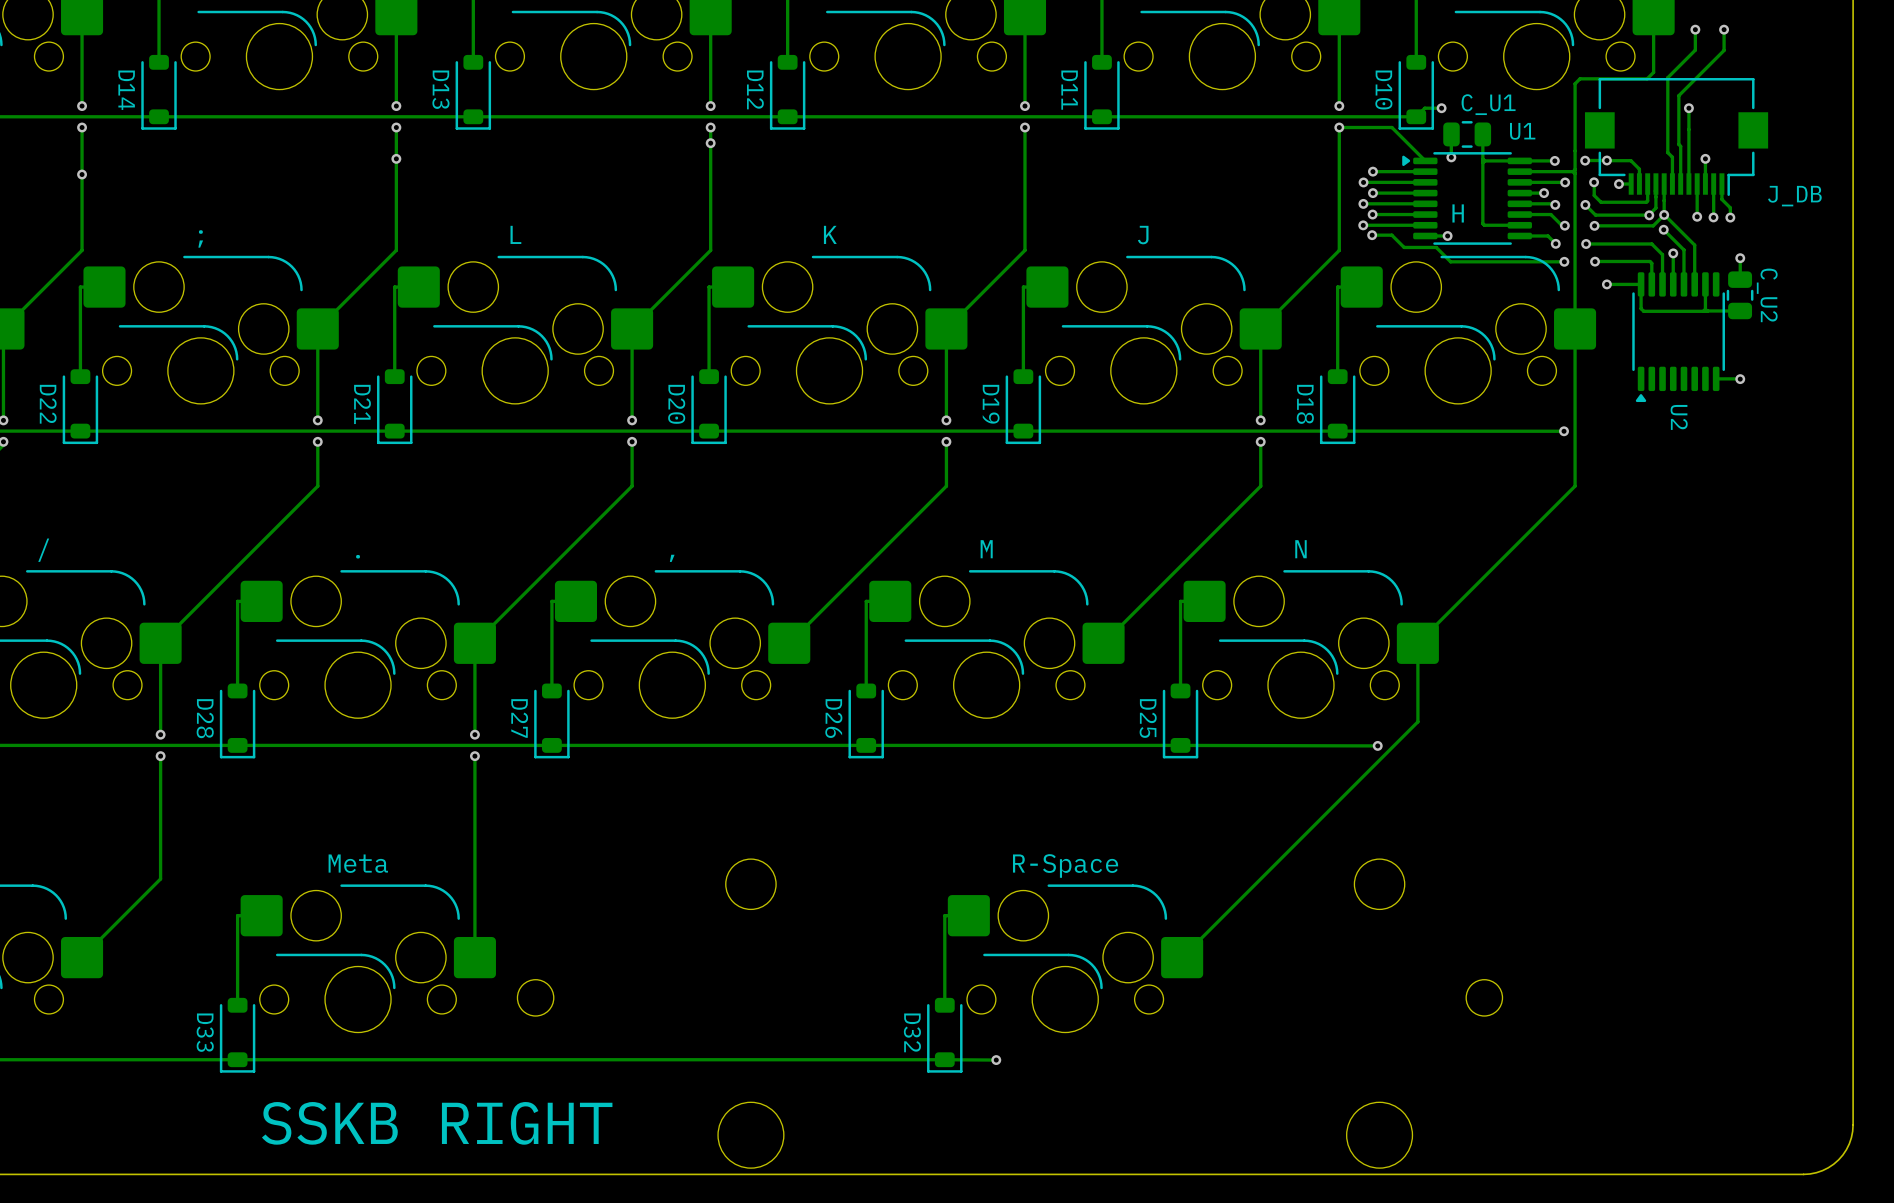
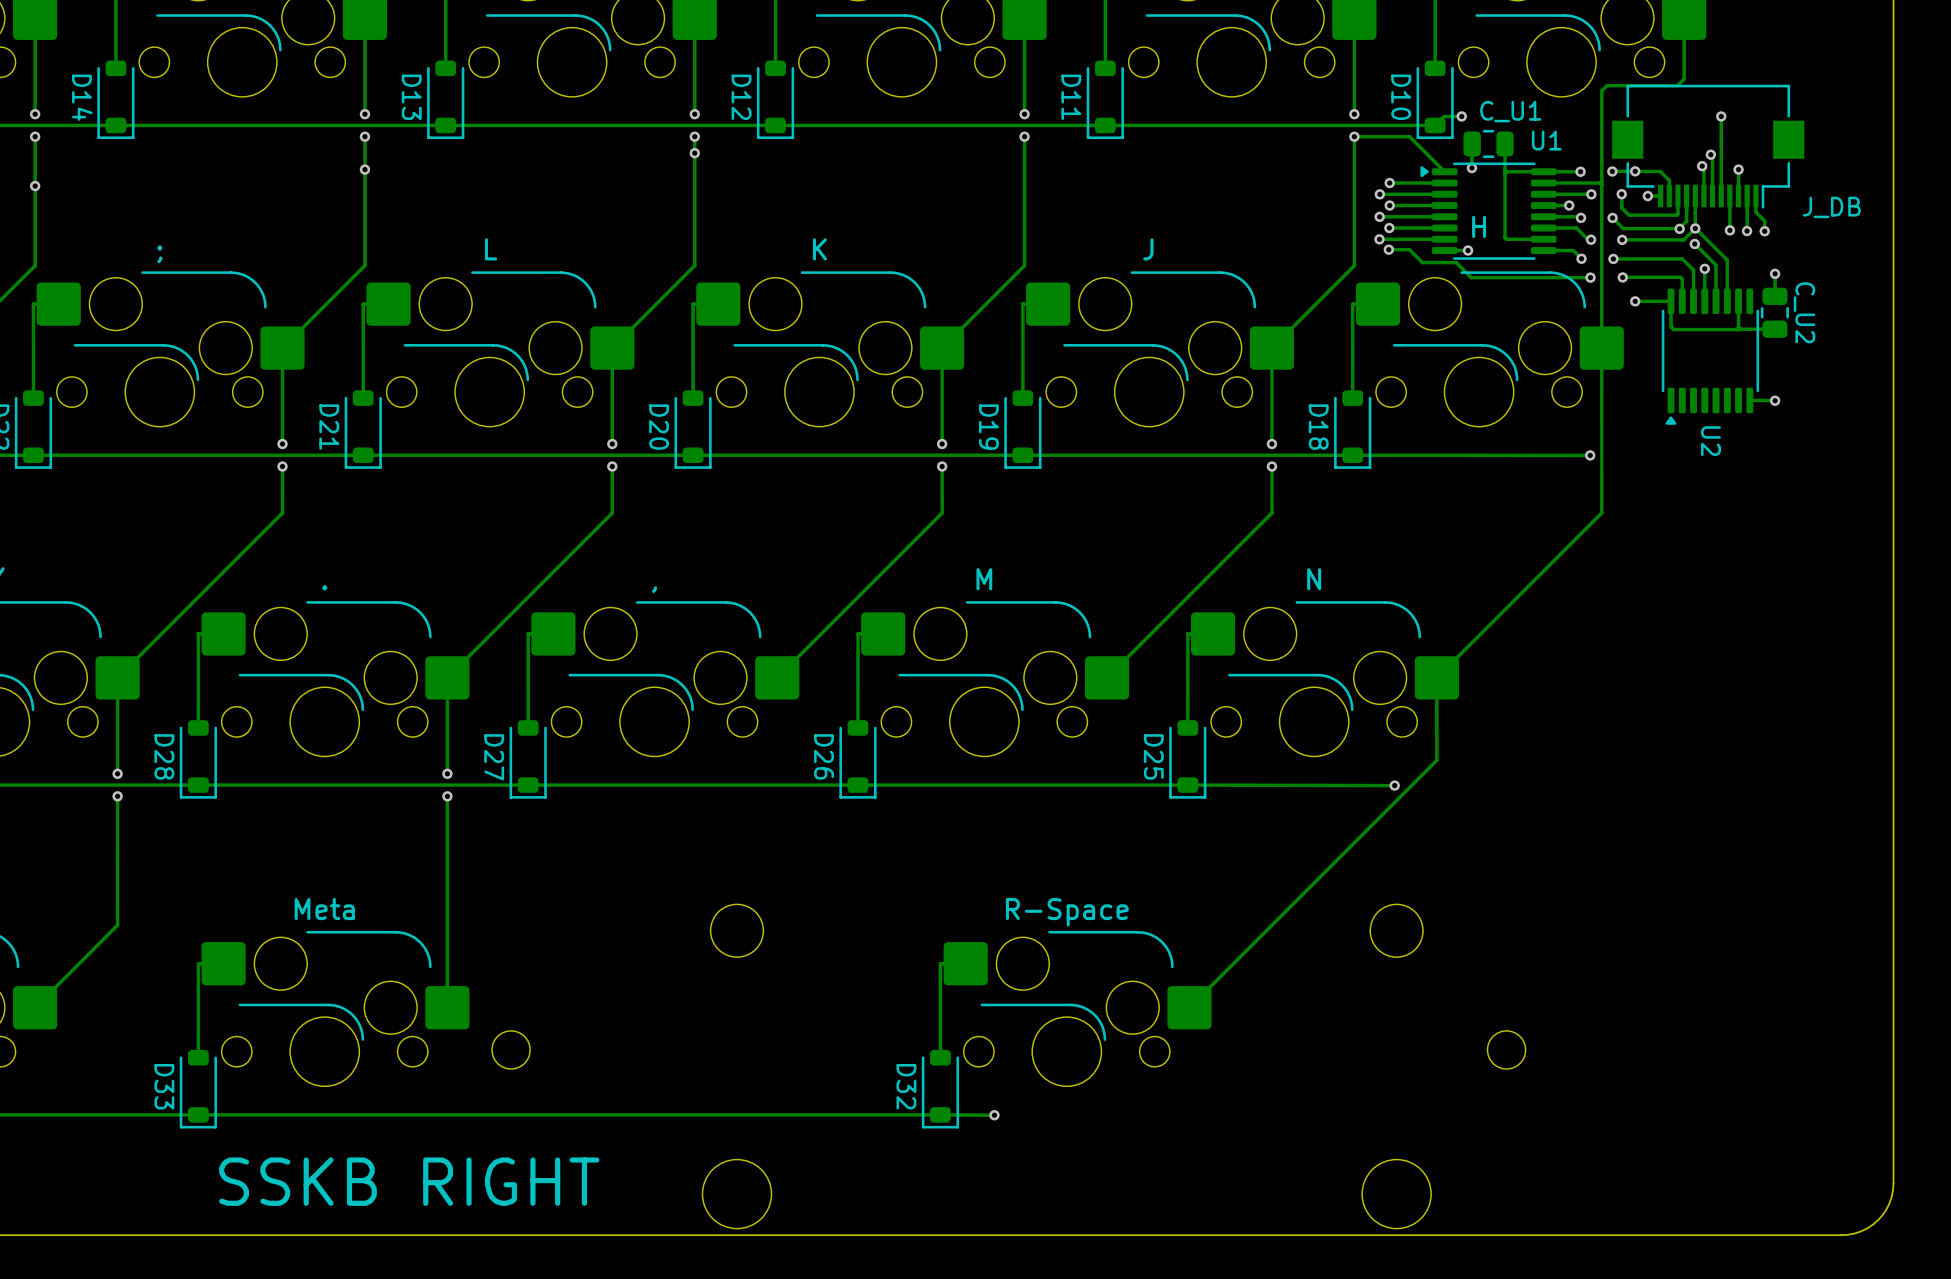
track: (1695, 29) (1695, 50) (1667, 77) (1667, 152) (1670, 155) -> none
via: (1695, 29) -> none
track: (1724, 29) (1724, 50) (1678, 95) (1678, 144) -> none
via: (1724, 29) -> none
via: none -> (1710, 154)
via: none -> (1702, 166)

